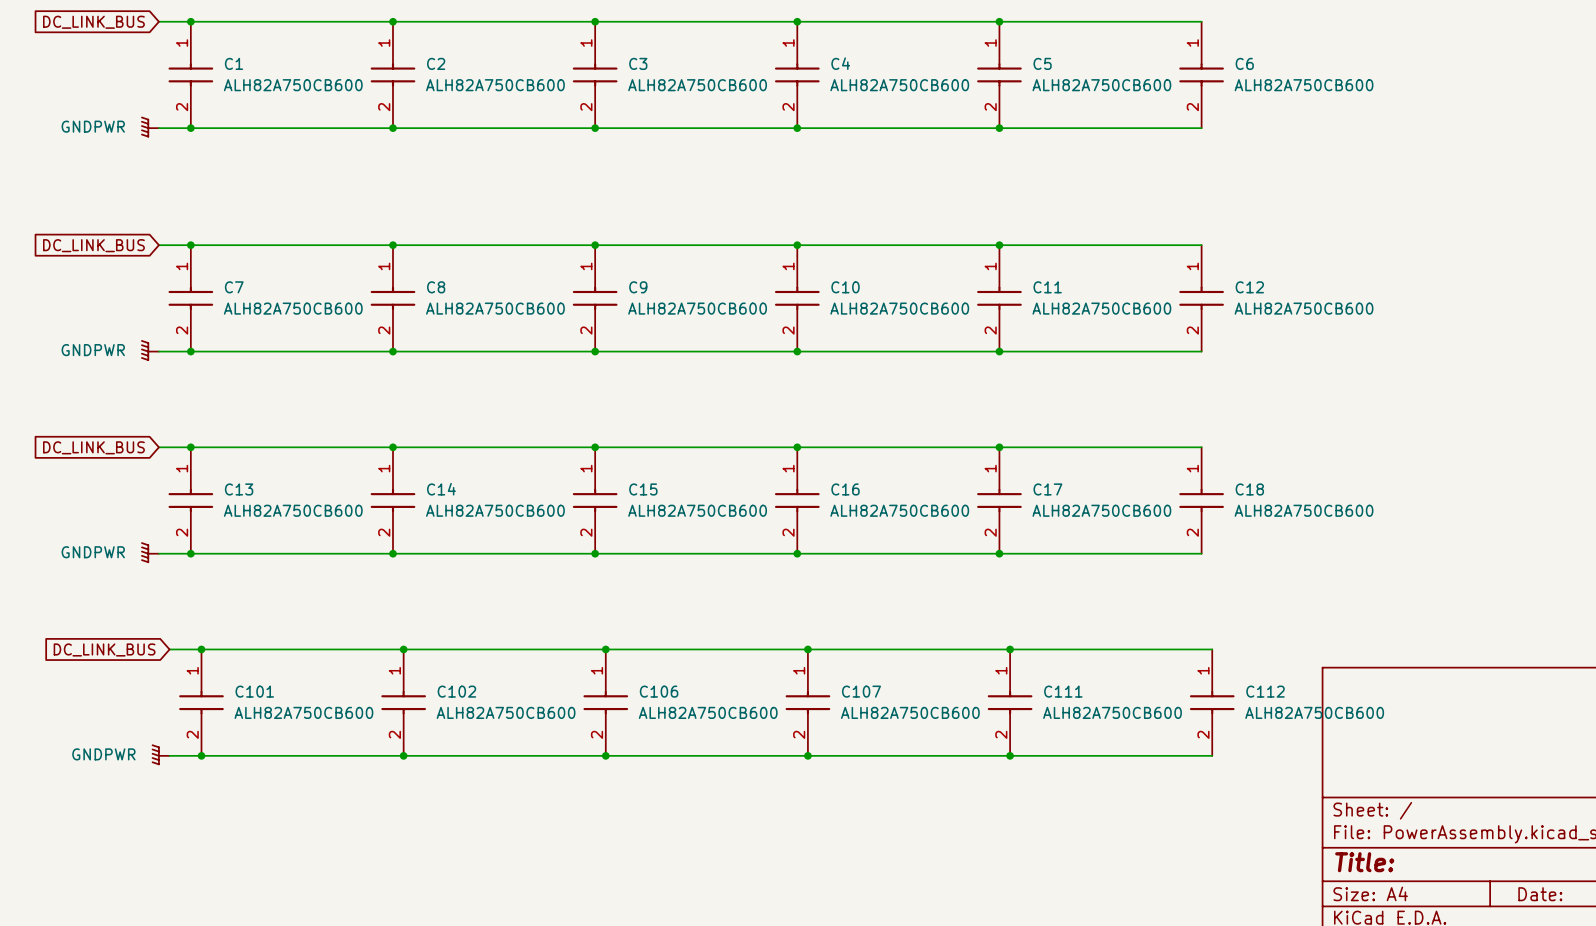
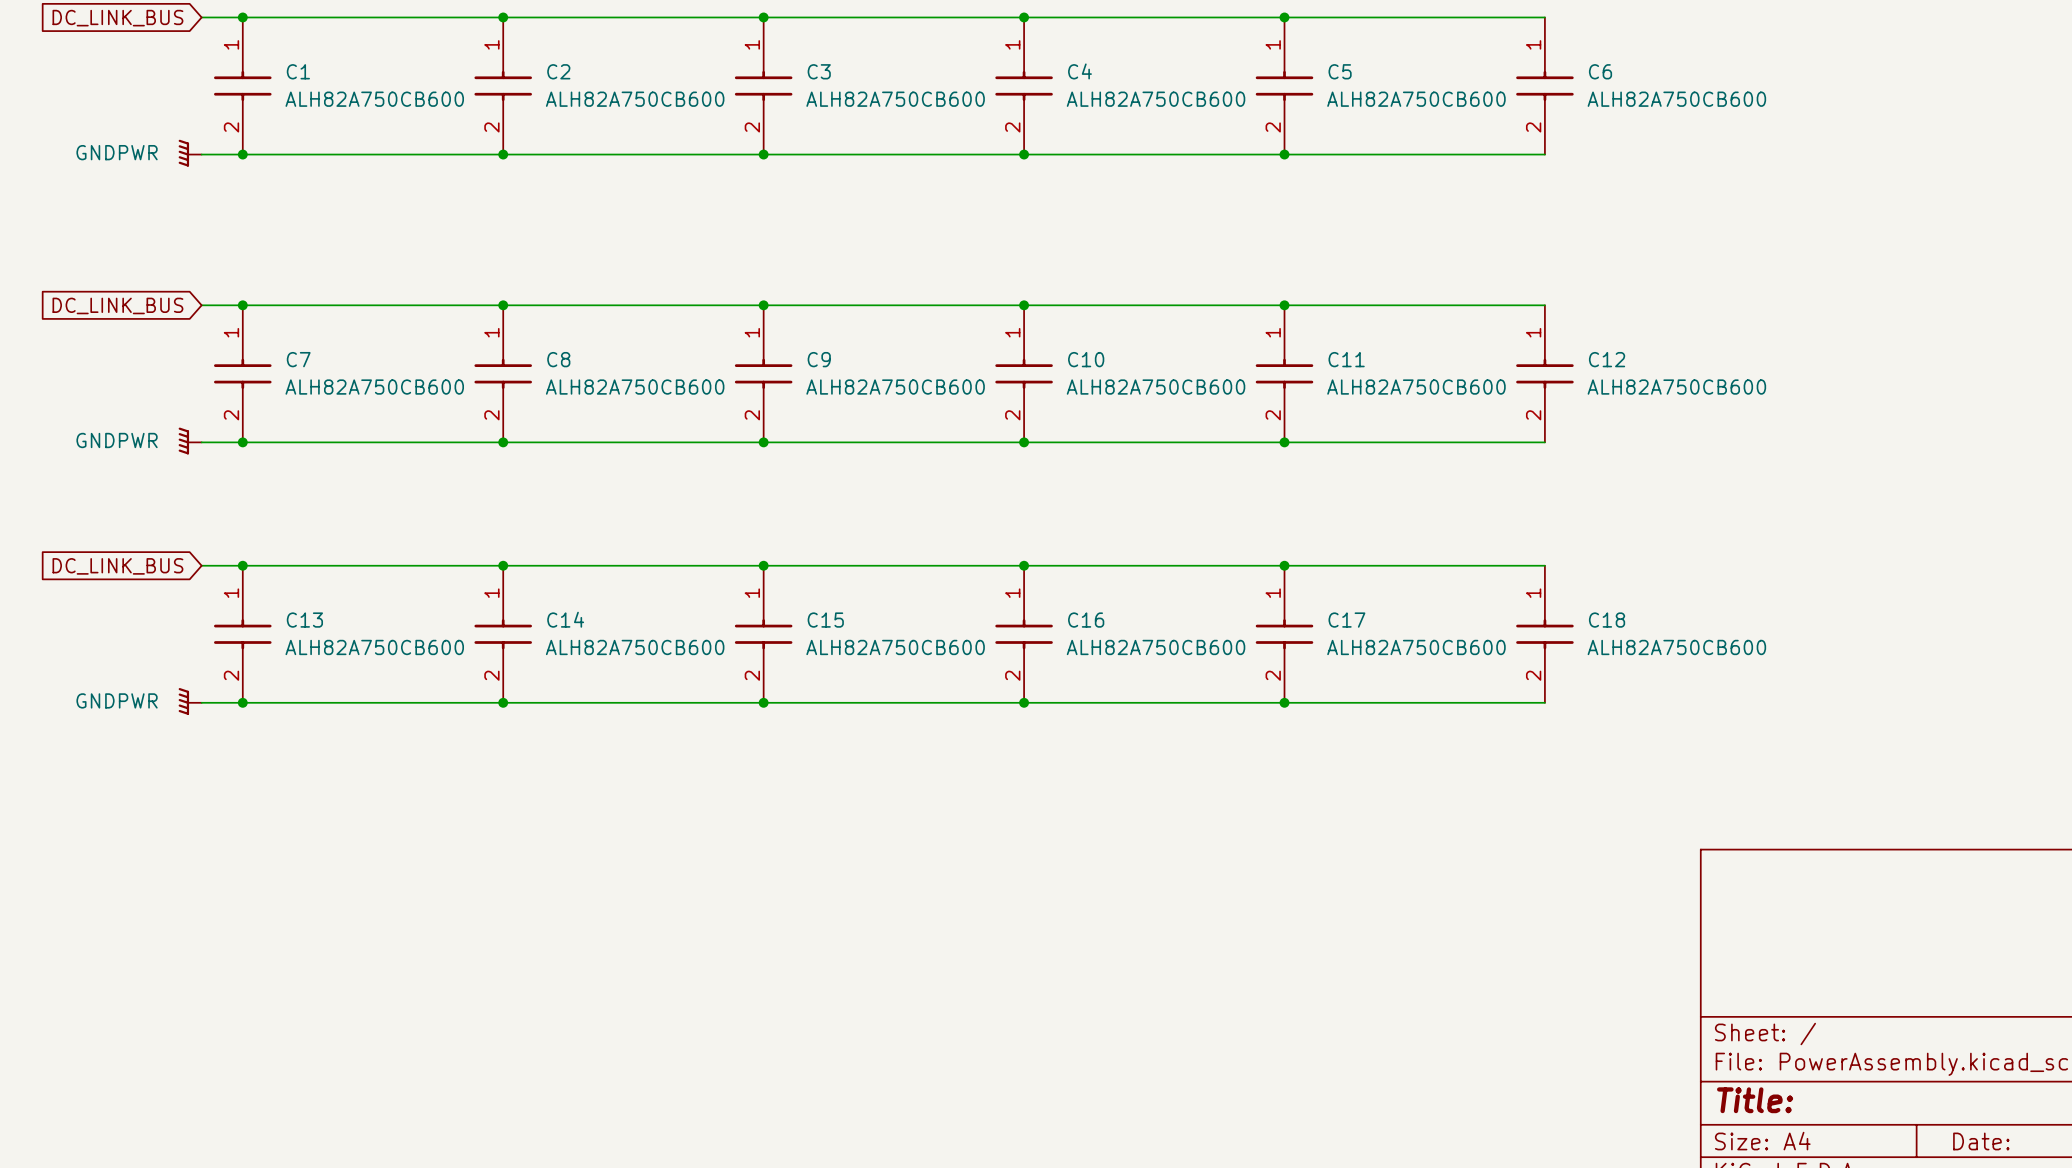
global label: DC_LINK_BUS (104, 649) -> none
wire: (169, 649) (1212, 649) -> none
junction: (201, 649) -> none
junction: (403, 649) -> none
junction: (605, 649) -> none
junction: (807, 649) -> none
junction: (1010, 649) -> none
C101: ALH82A750CB600 (201, 702) -> none
C102: ALH82A750CB600 (403, 702) -> none
C106: ALH82A750CB600 (605, 702) -> none
C107: ALH82A750CB600 (807, 702) -> none
C111: ALH82A750CB600 (1010, 702) -> none
C112: ALH82A750CB600 (1212, 702) -> none
power symbol: GNDPWR (160, 754) -> none
wire: (169, 755) (1212, 755) -> none
junction: (201, 755) -> none
junction: (403, 755) -> none
junction: (605, 755) -> none
junction: (807, 755) -> none
junction: (1010, 755) -> none

